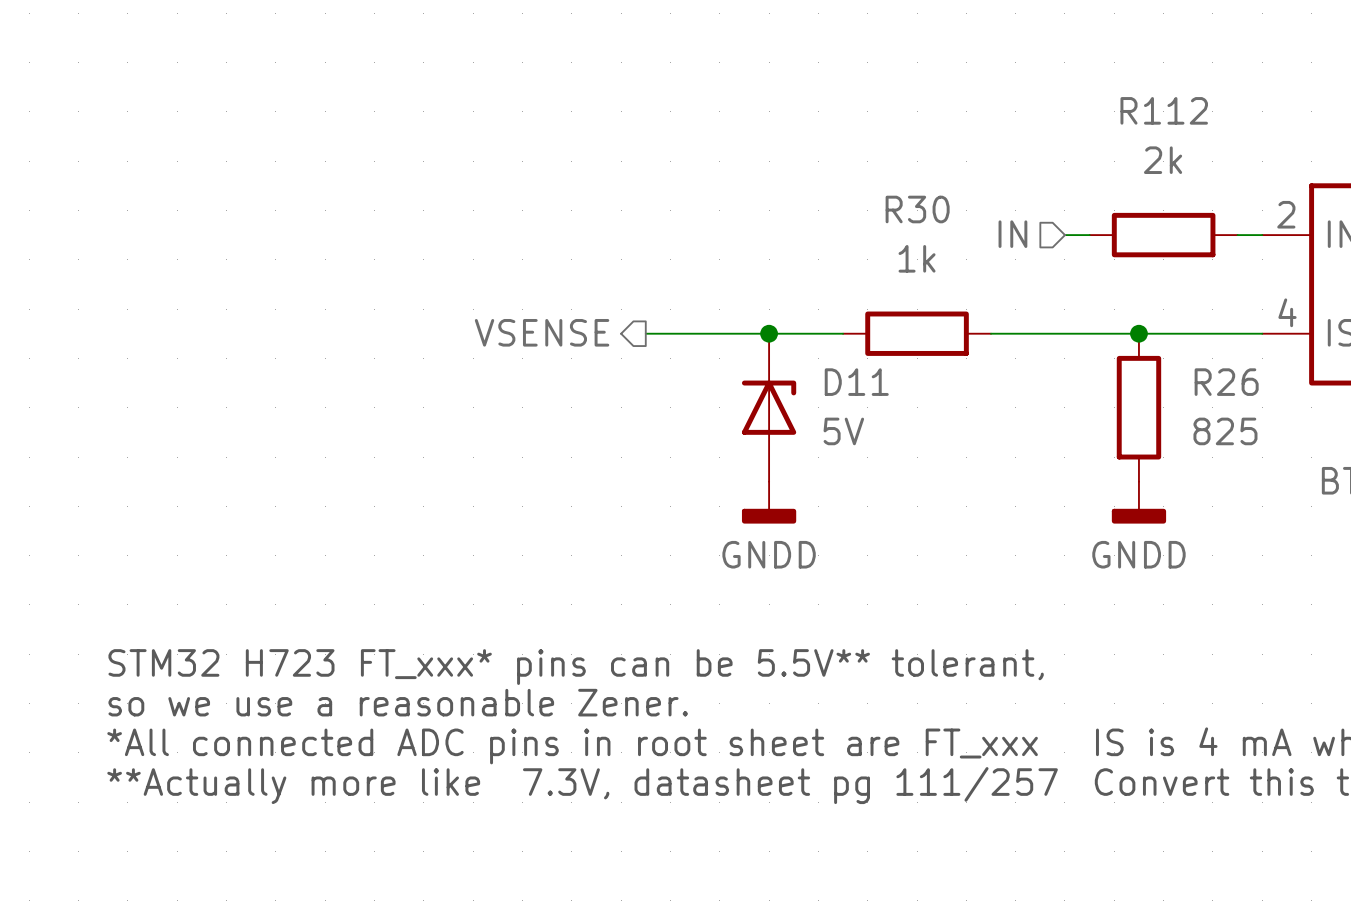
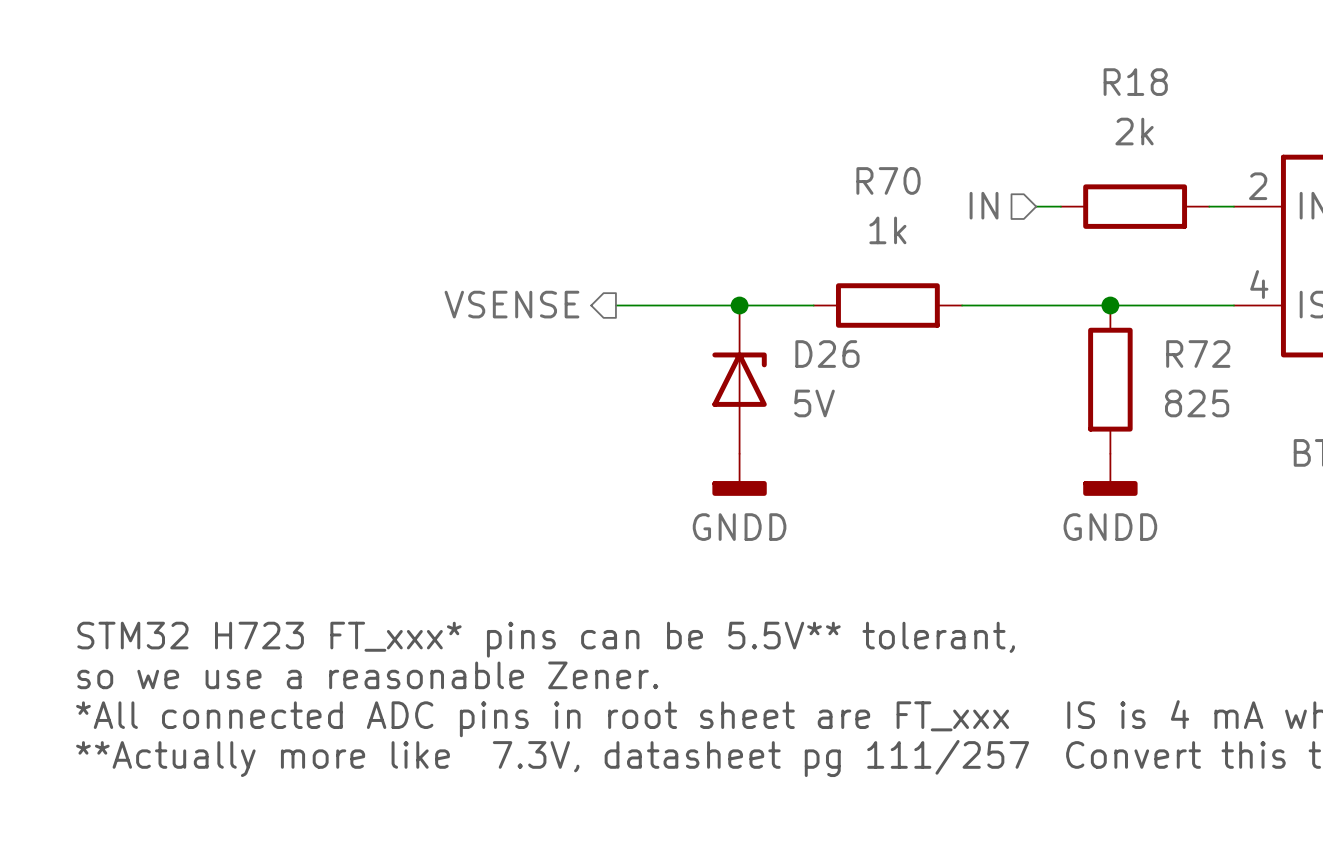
R112 name: R112 (1164, 110) -> R18 (1135, 82)
R30 name: R30 (917, 209) -> R70 (888, 180)
D11 name: D11 (856, 382) -> D26 (827, 354)
R26 name: R26 (1226, 382) -> R72 (1198, 354)

